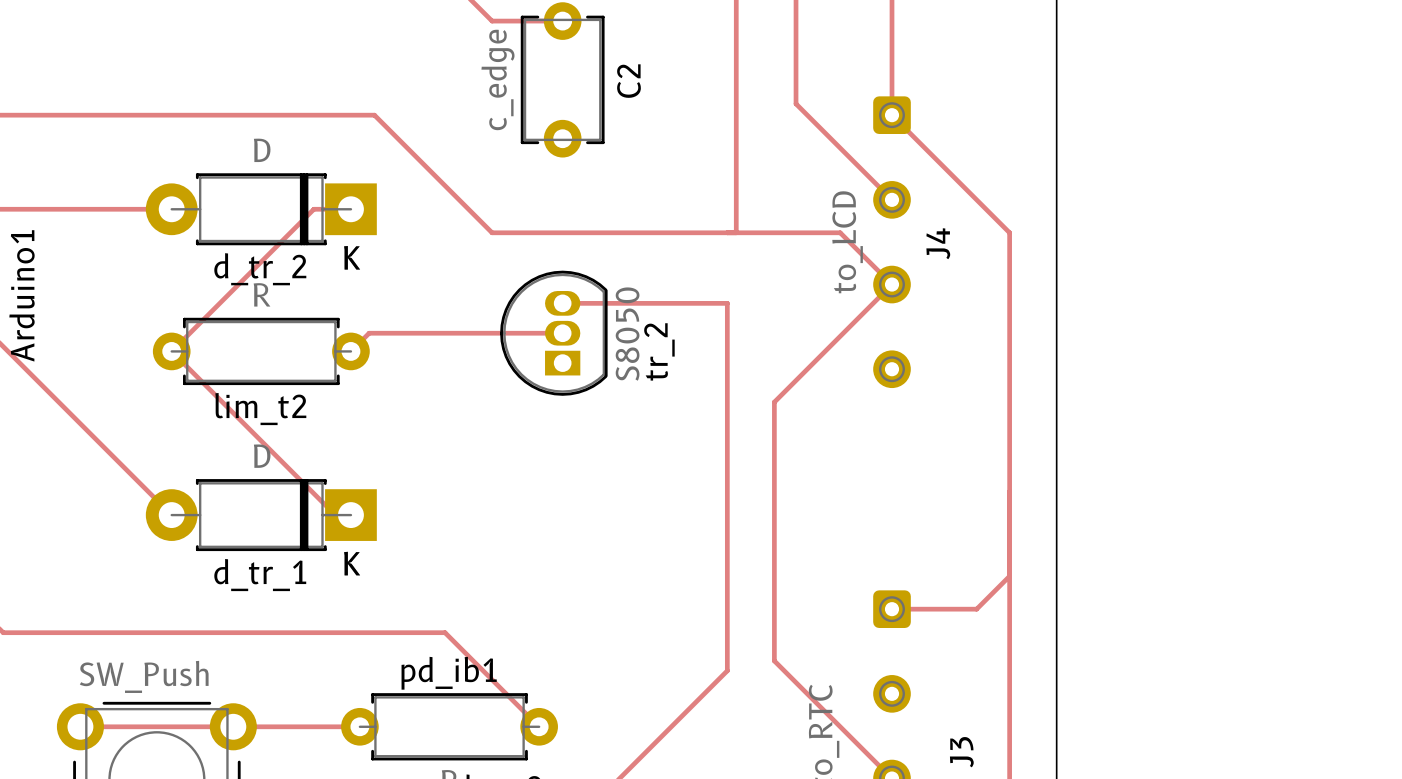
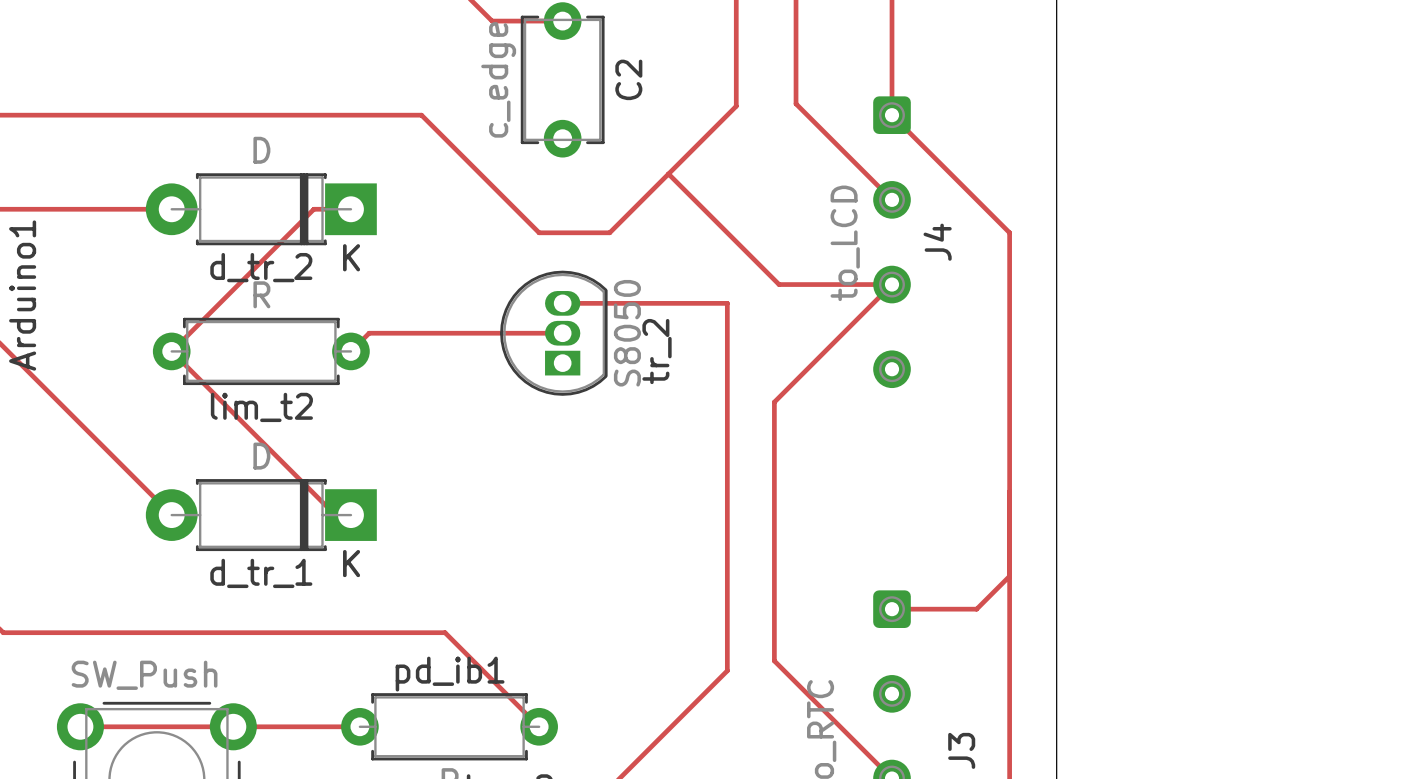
track: (736, 106) (736, 232) -> (736, 106) (609, 232)
track: (374, 115) (492, 232) (539, 232) -> (374, 115) (421, 115) (539, 232)
track: none -> (668, 173) (779, 284) (892, 284)
track: (609, 232) (840, 232) (885, 277) -> none

